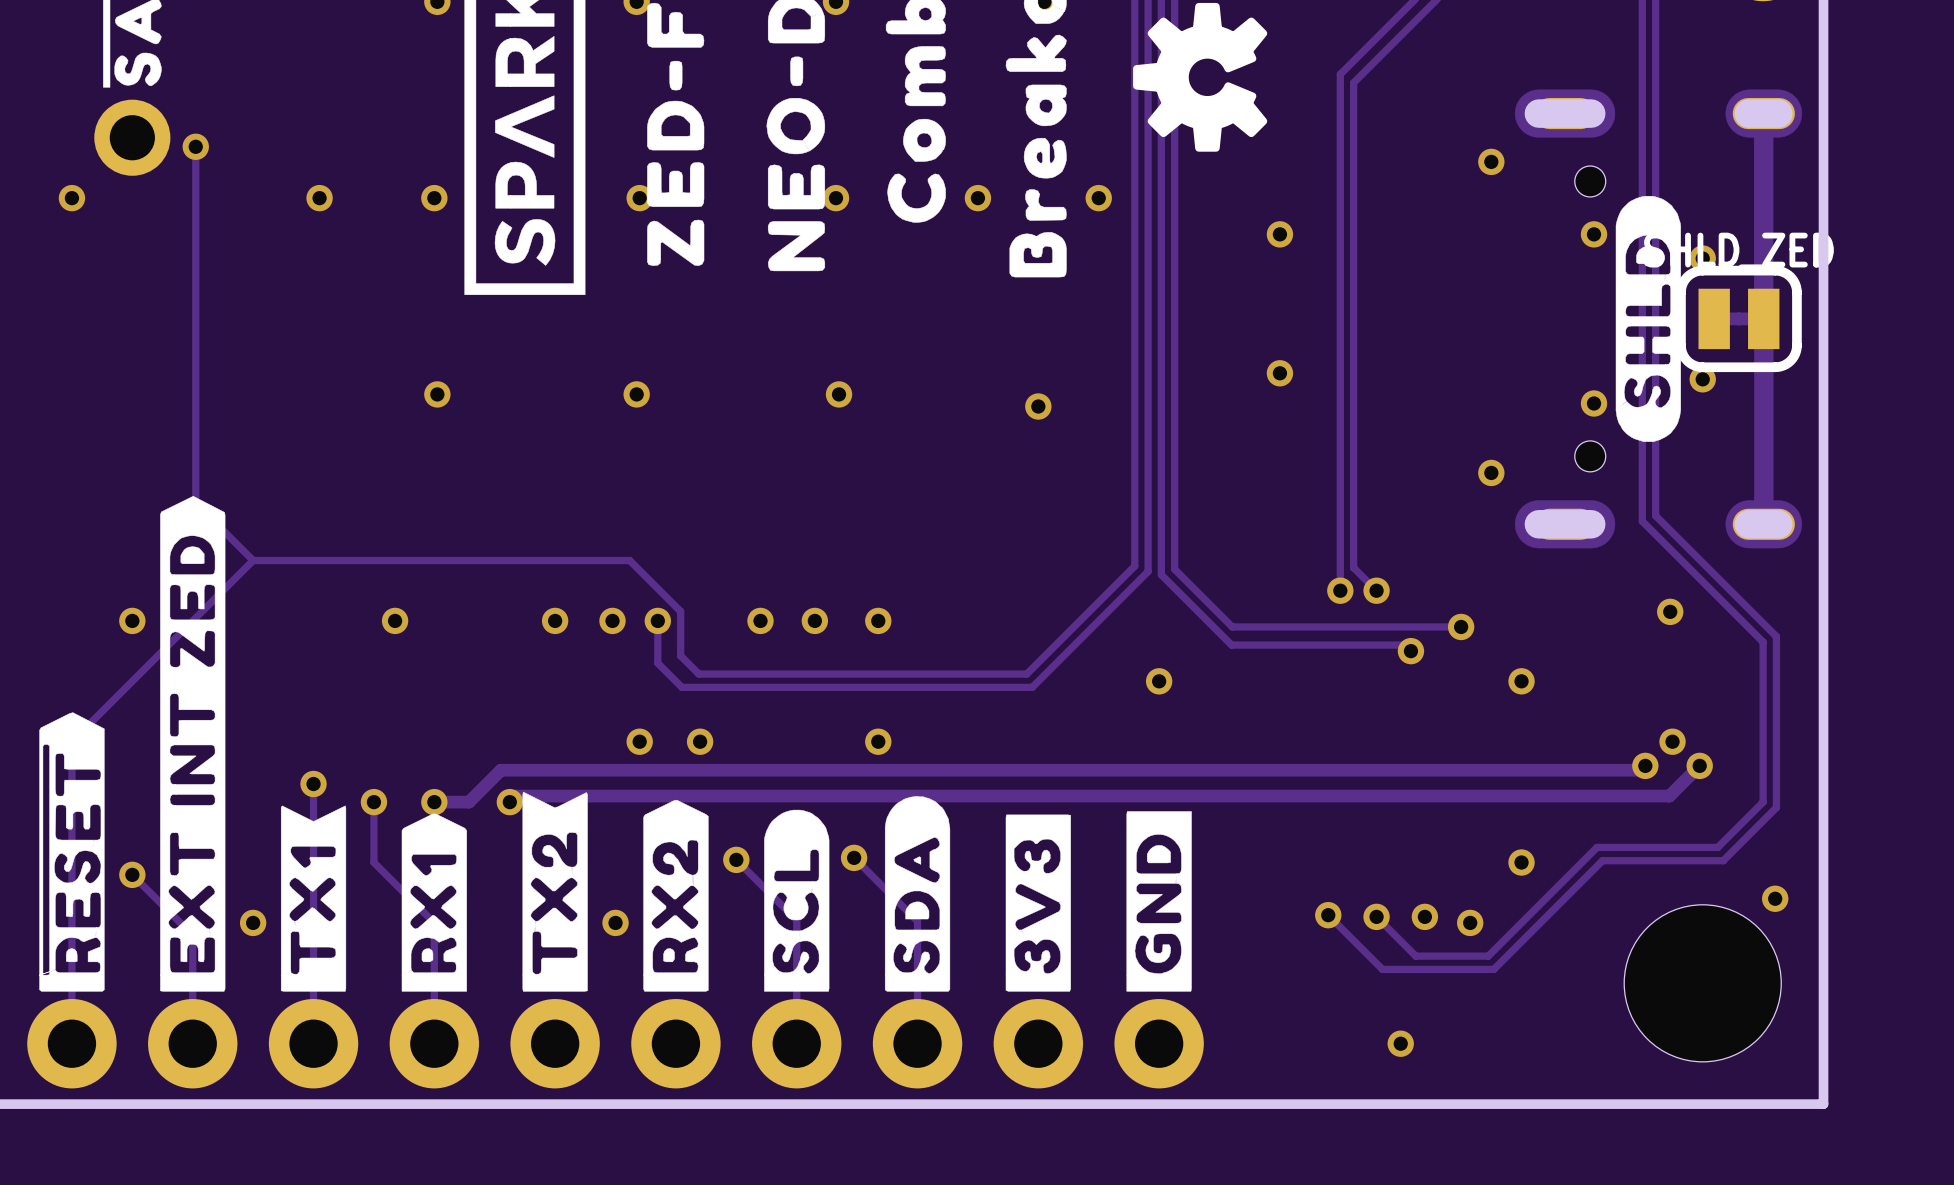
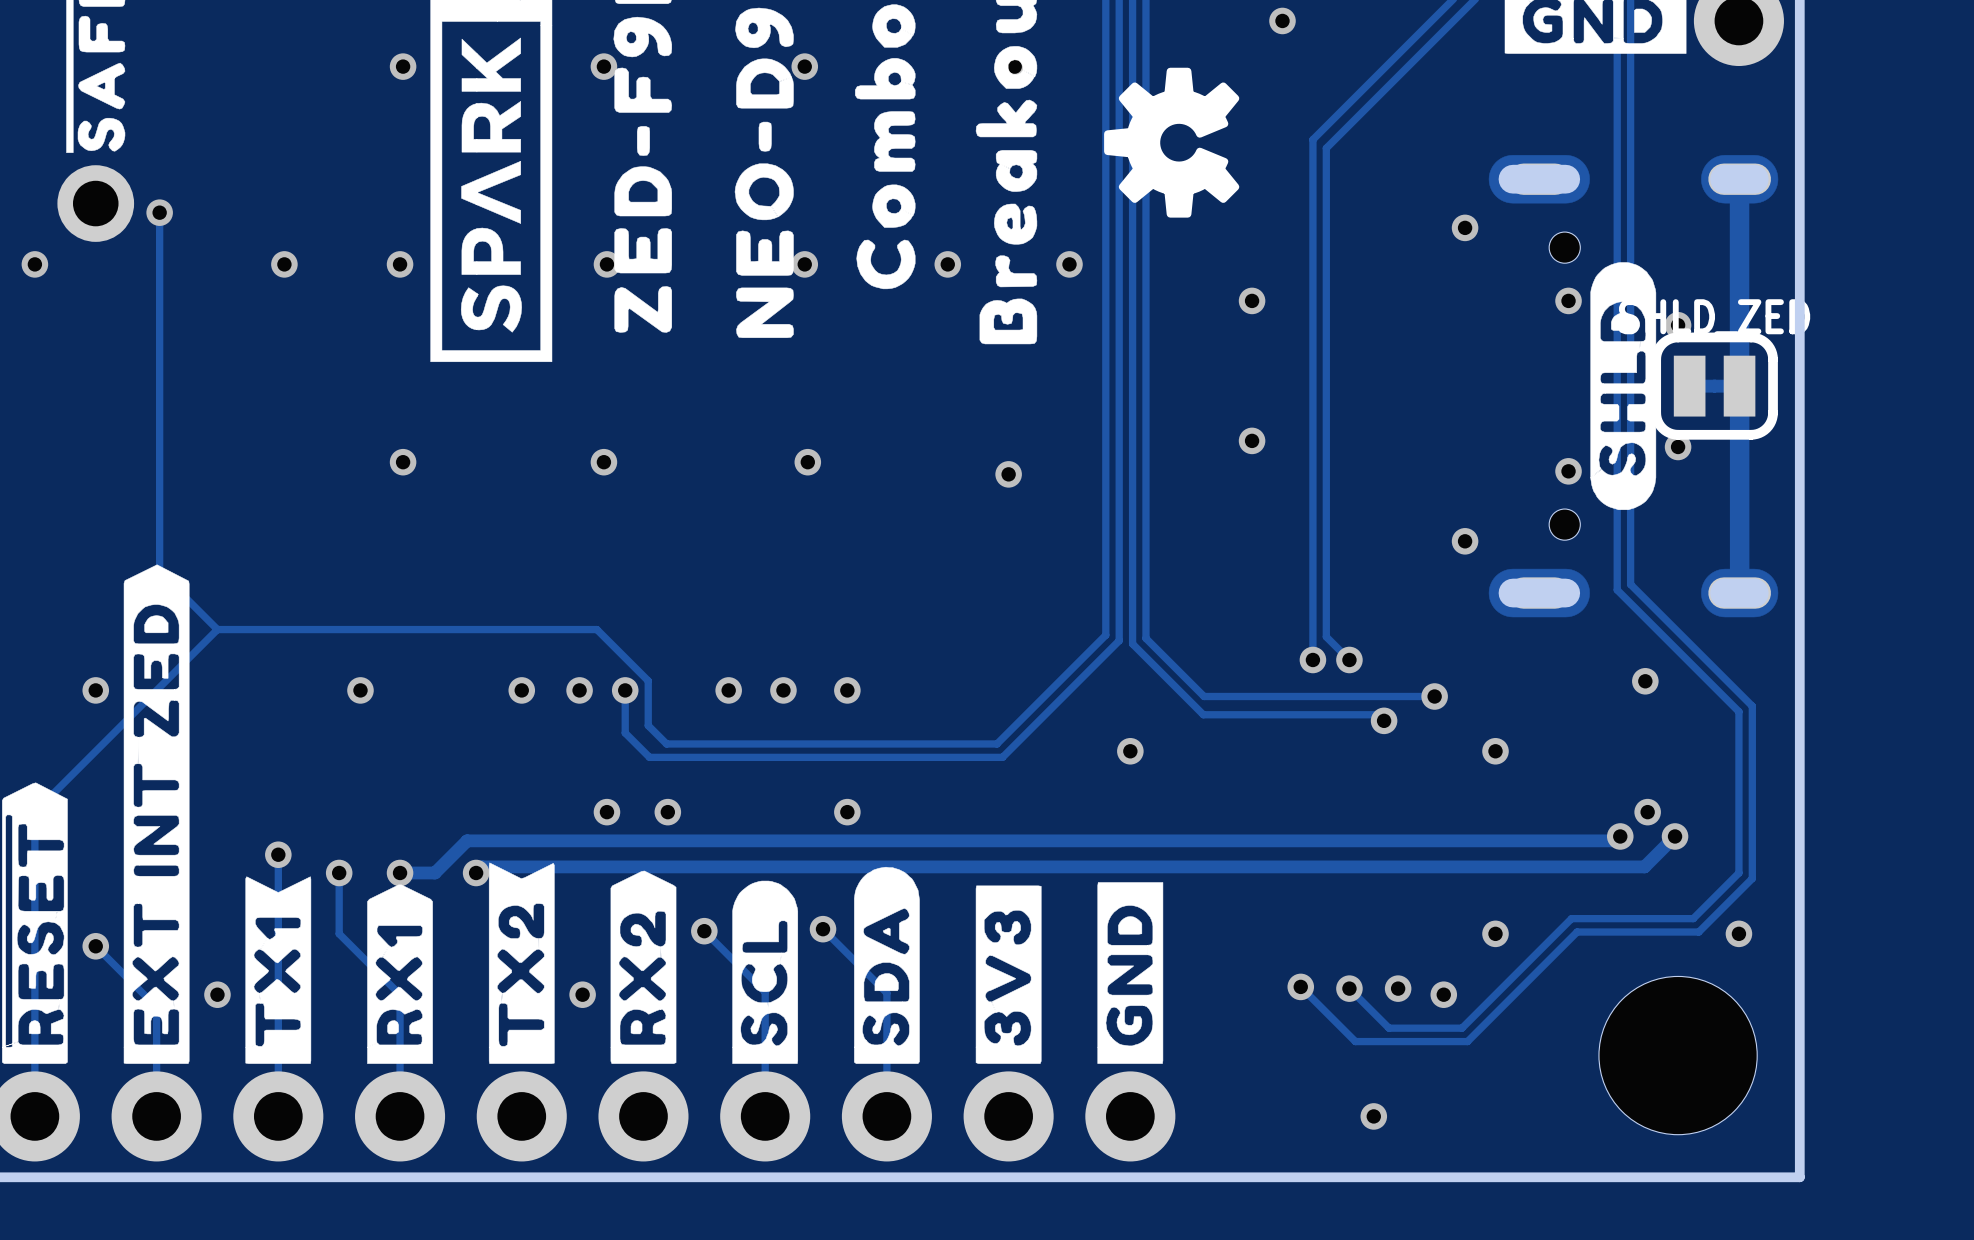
via position: (1775, 898) -> (1738, 933)

